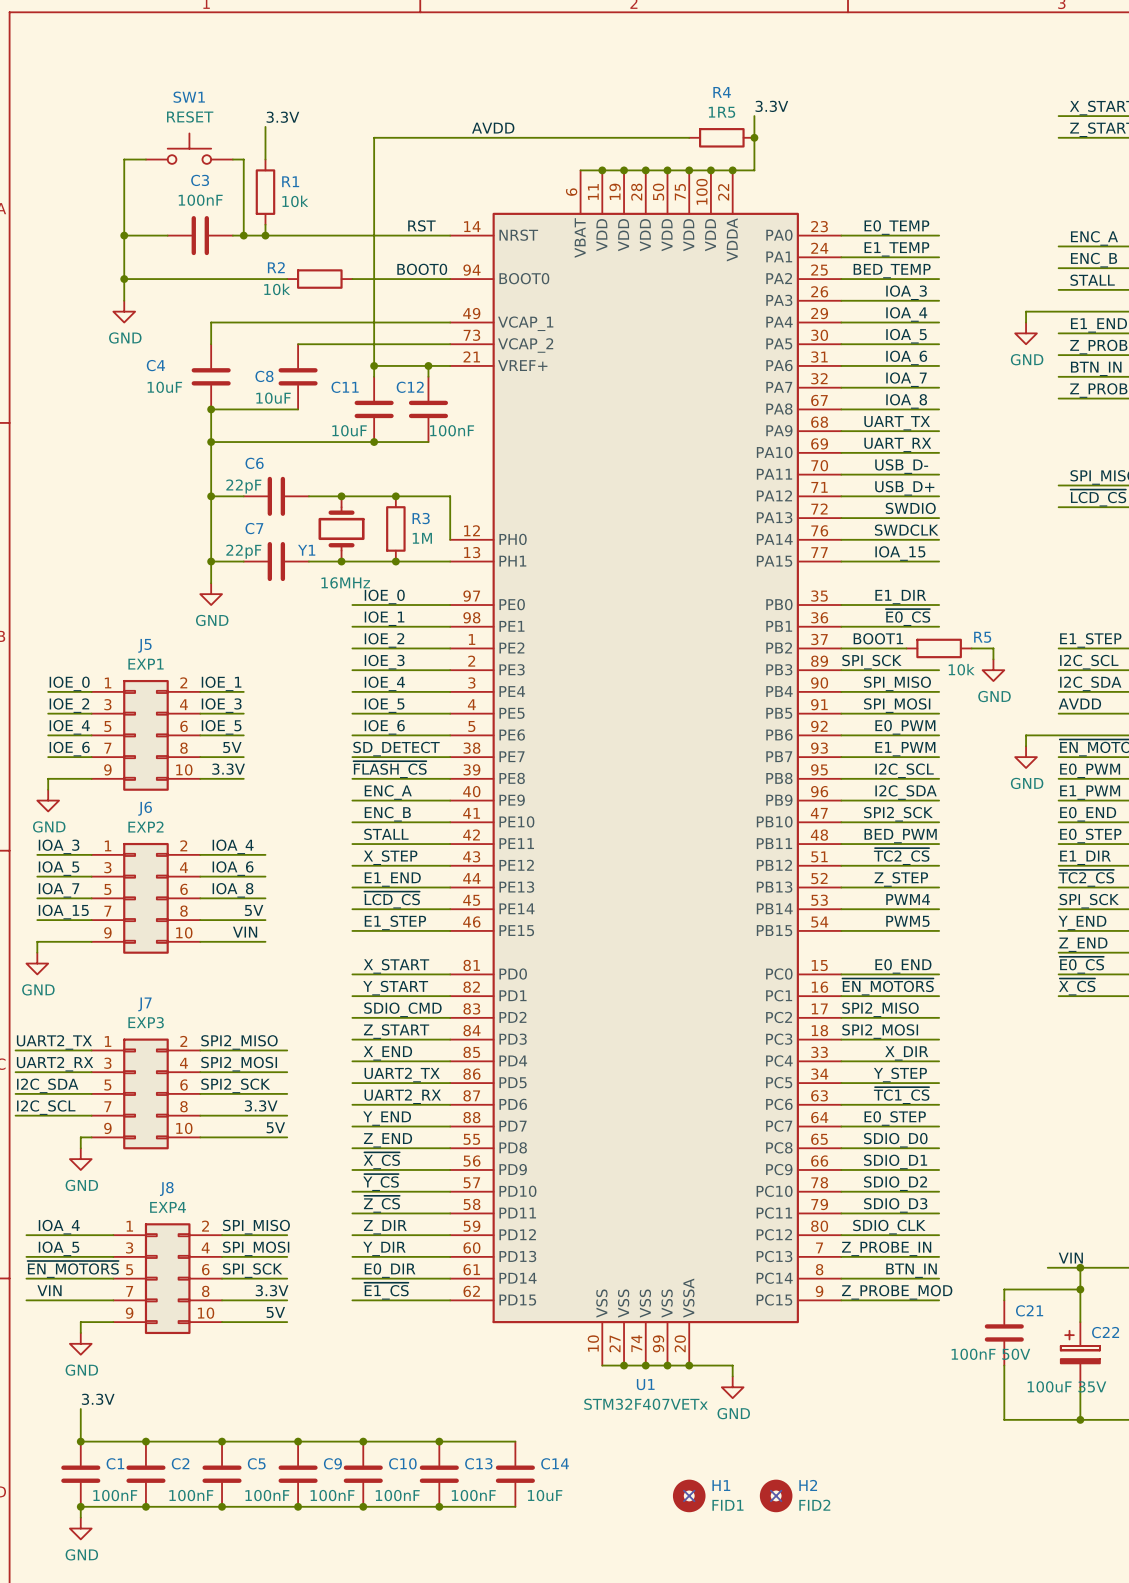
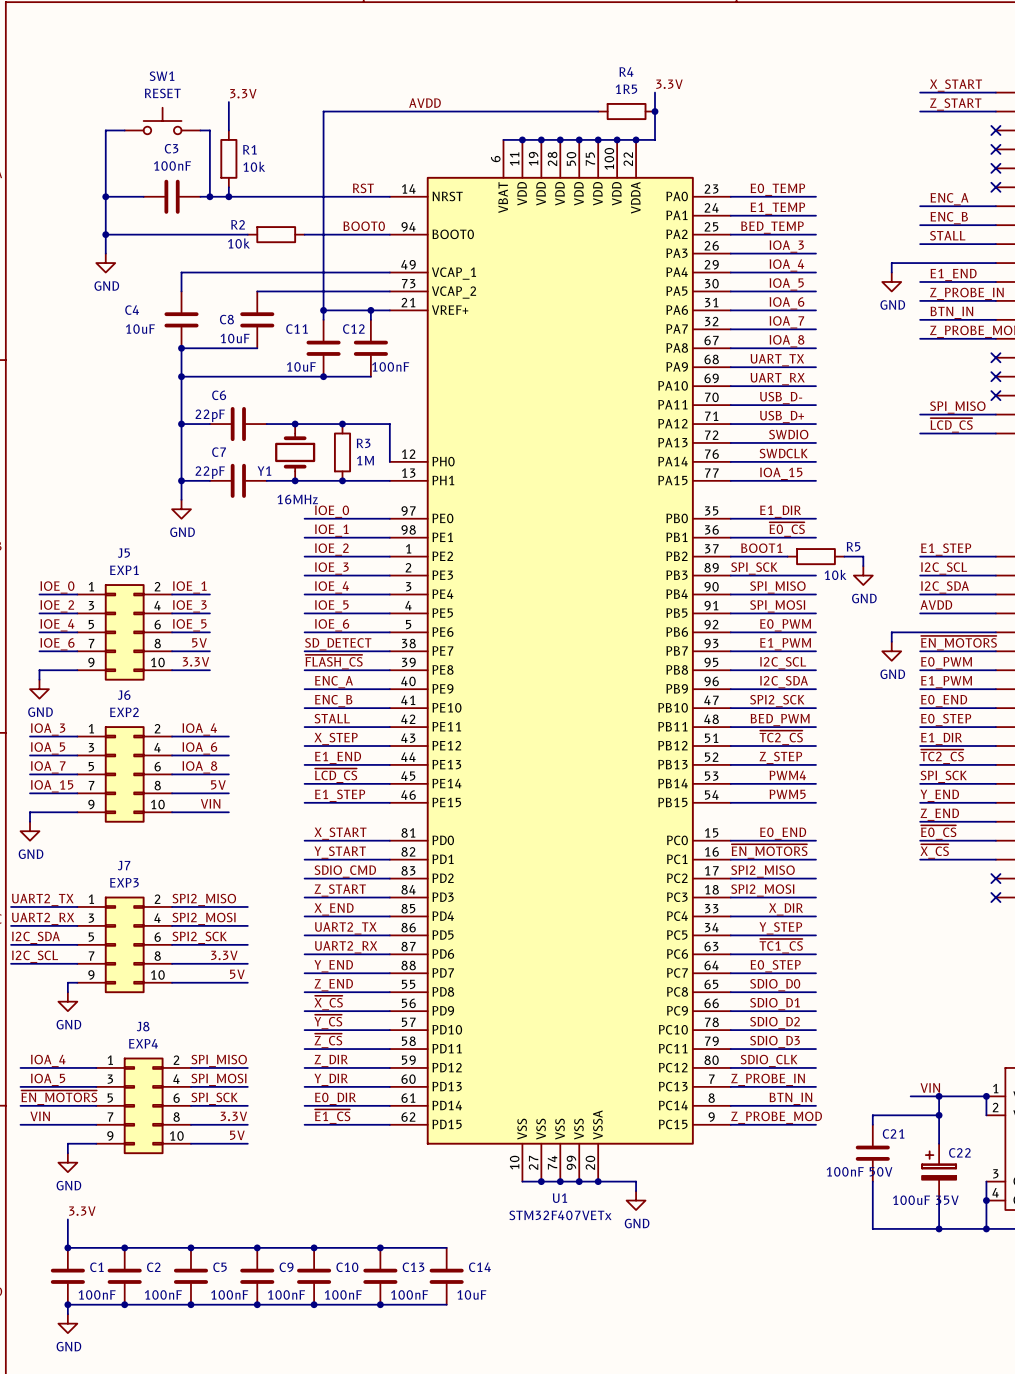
H1: FID1 (689, 1495) -> none
no-connect mark: (689, 1495) -> none
H2: FID2 (776, 1495) -> none
no-connect mark: (776, 1495) -> none

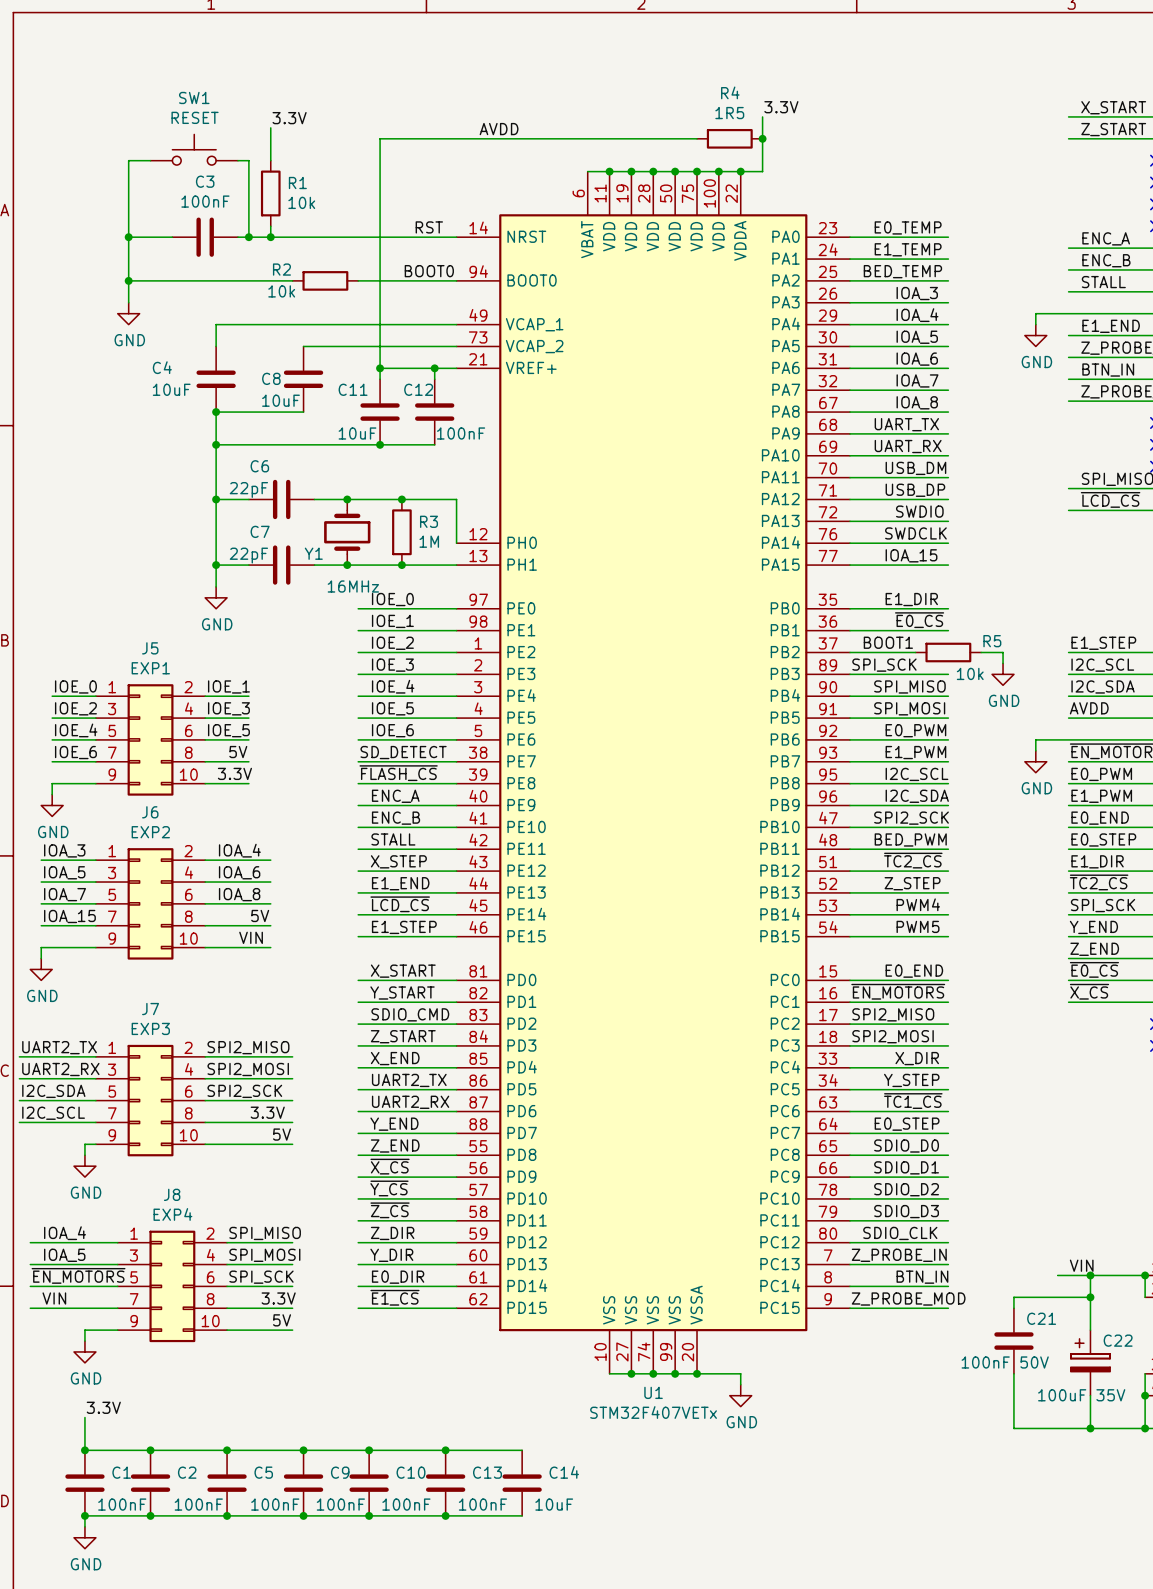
label: USB_D- (781, 398) -> USB_DM (915, 468)
label: USB_D+ (782, 417) -> USB_DP (915, 490)

